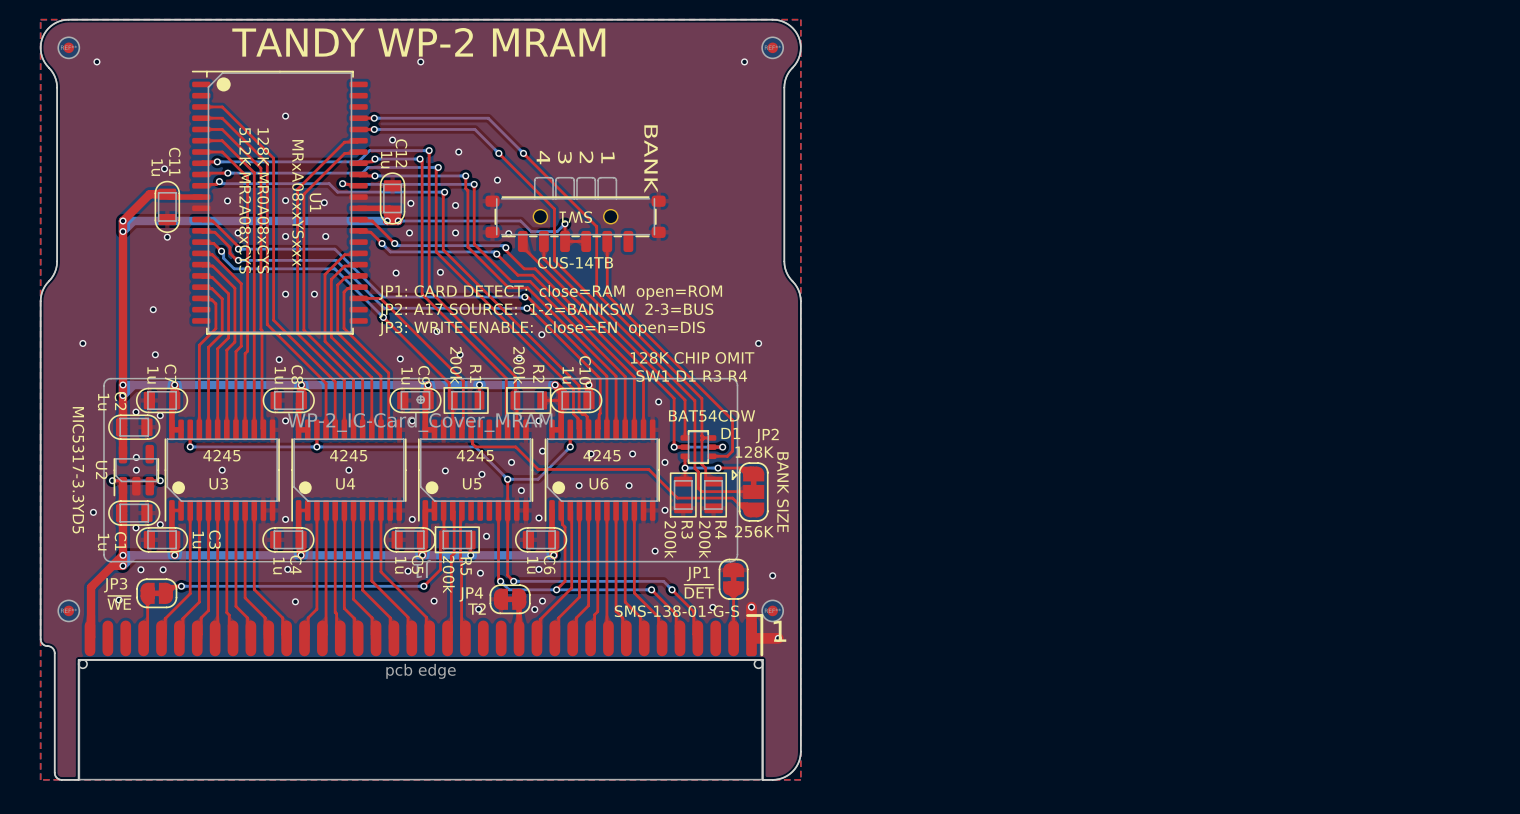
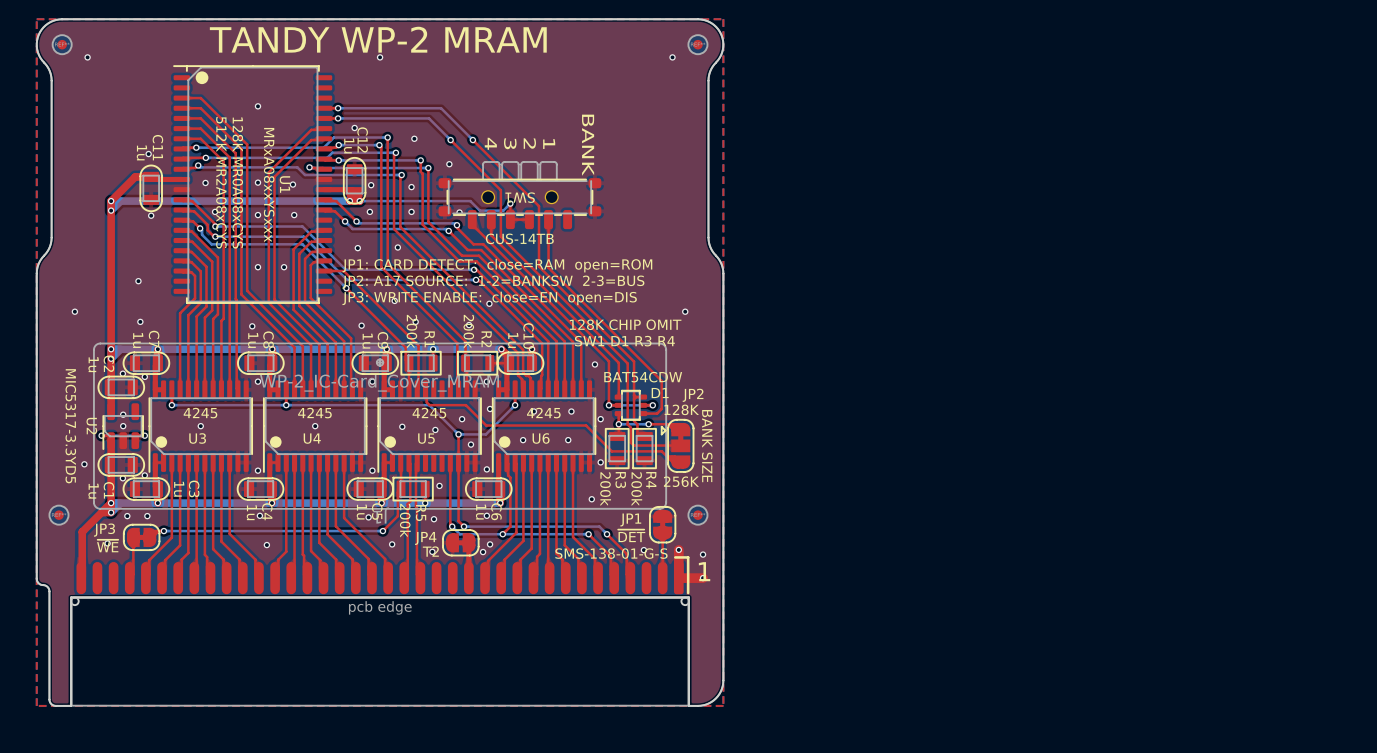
via position: (772, 575) -> (703, 554)
part position: (68, 610) -> (58, 515)
part position: (772, 610) -> (697, 515)

